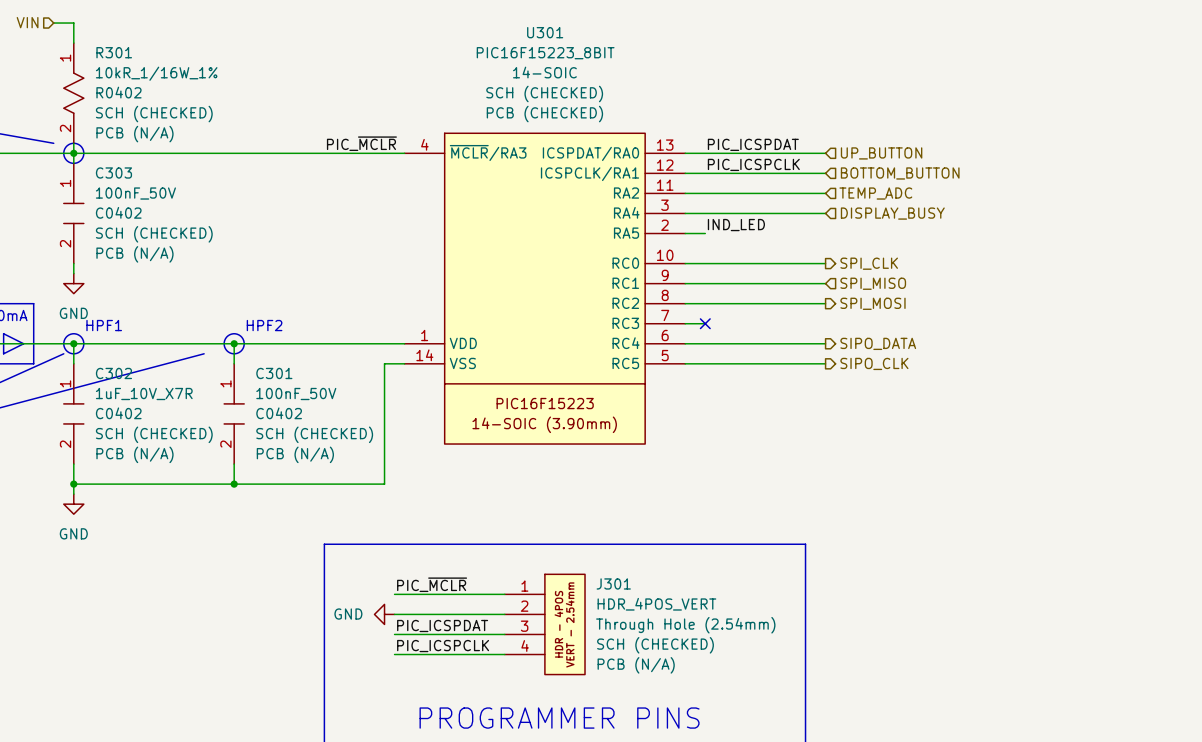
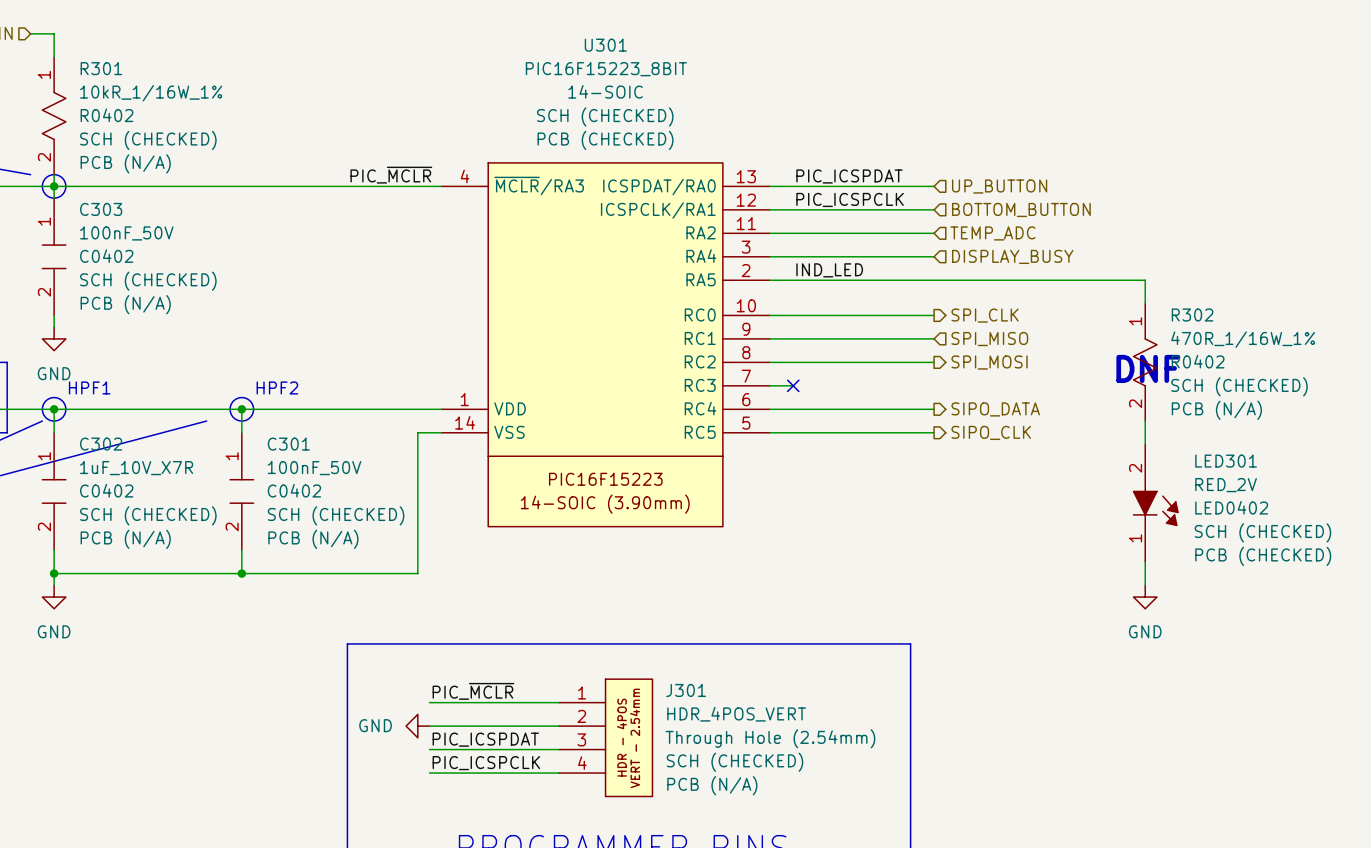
wire: none -> (793, 280) (1145, 280) (1145, 303)
R302: none -> 470R_1/16W_1% (1145, 362)
text: none -> DNF (1148, 368)
wire: none -> (1145, 421) (1145, 444)
LED301: none -> RED_2V (1155, 503)
wire: none -> (1145, 561) (1145, 585)
power symbol: none -> GND (1145, 597)

